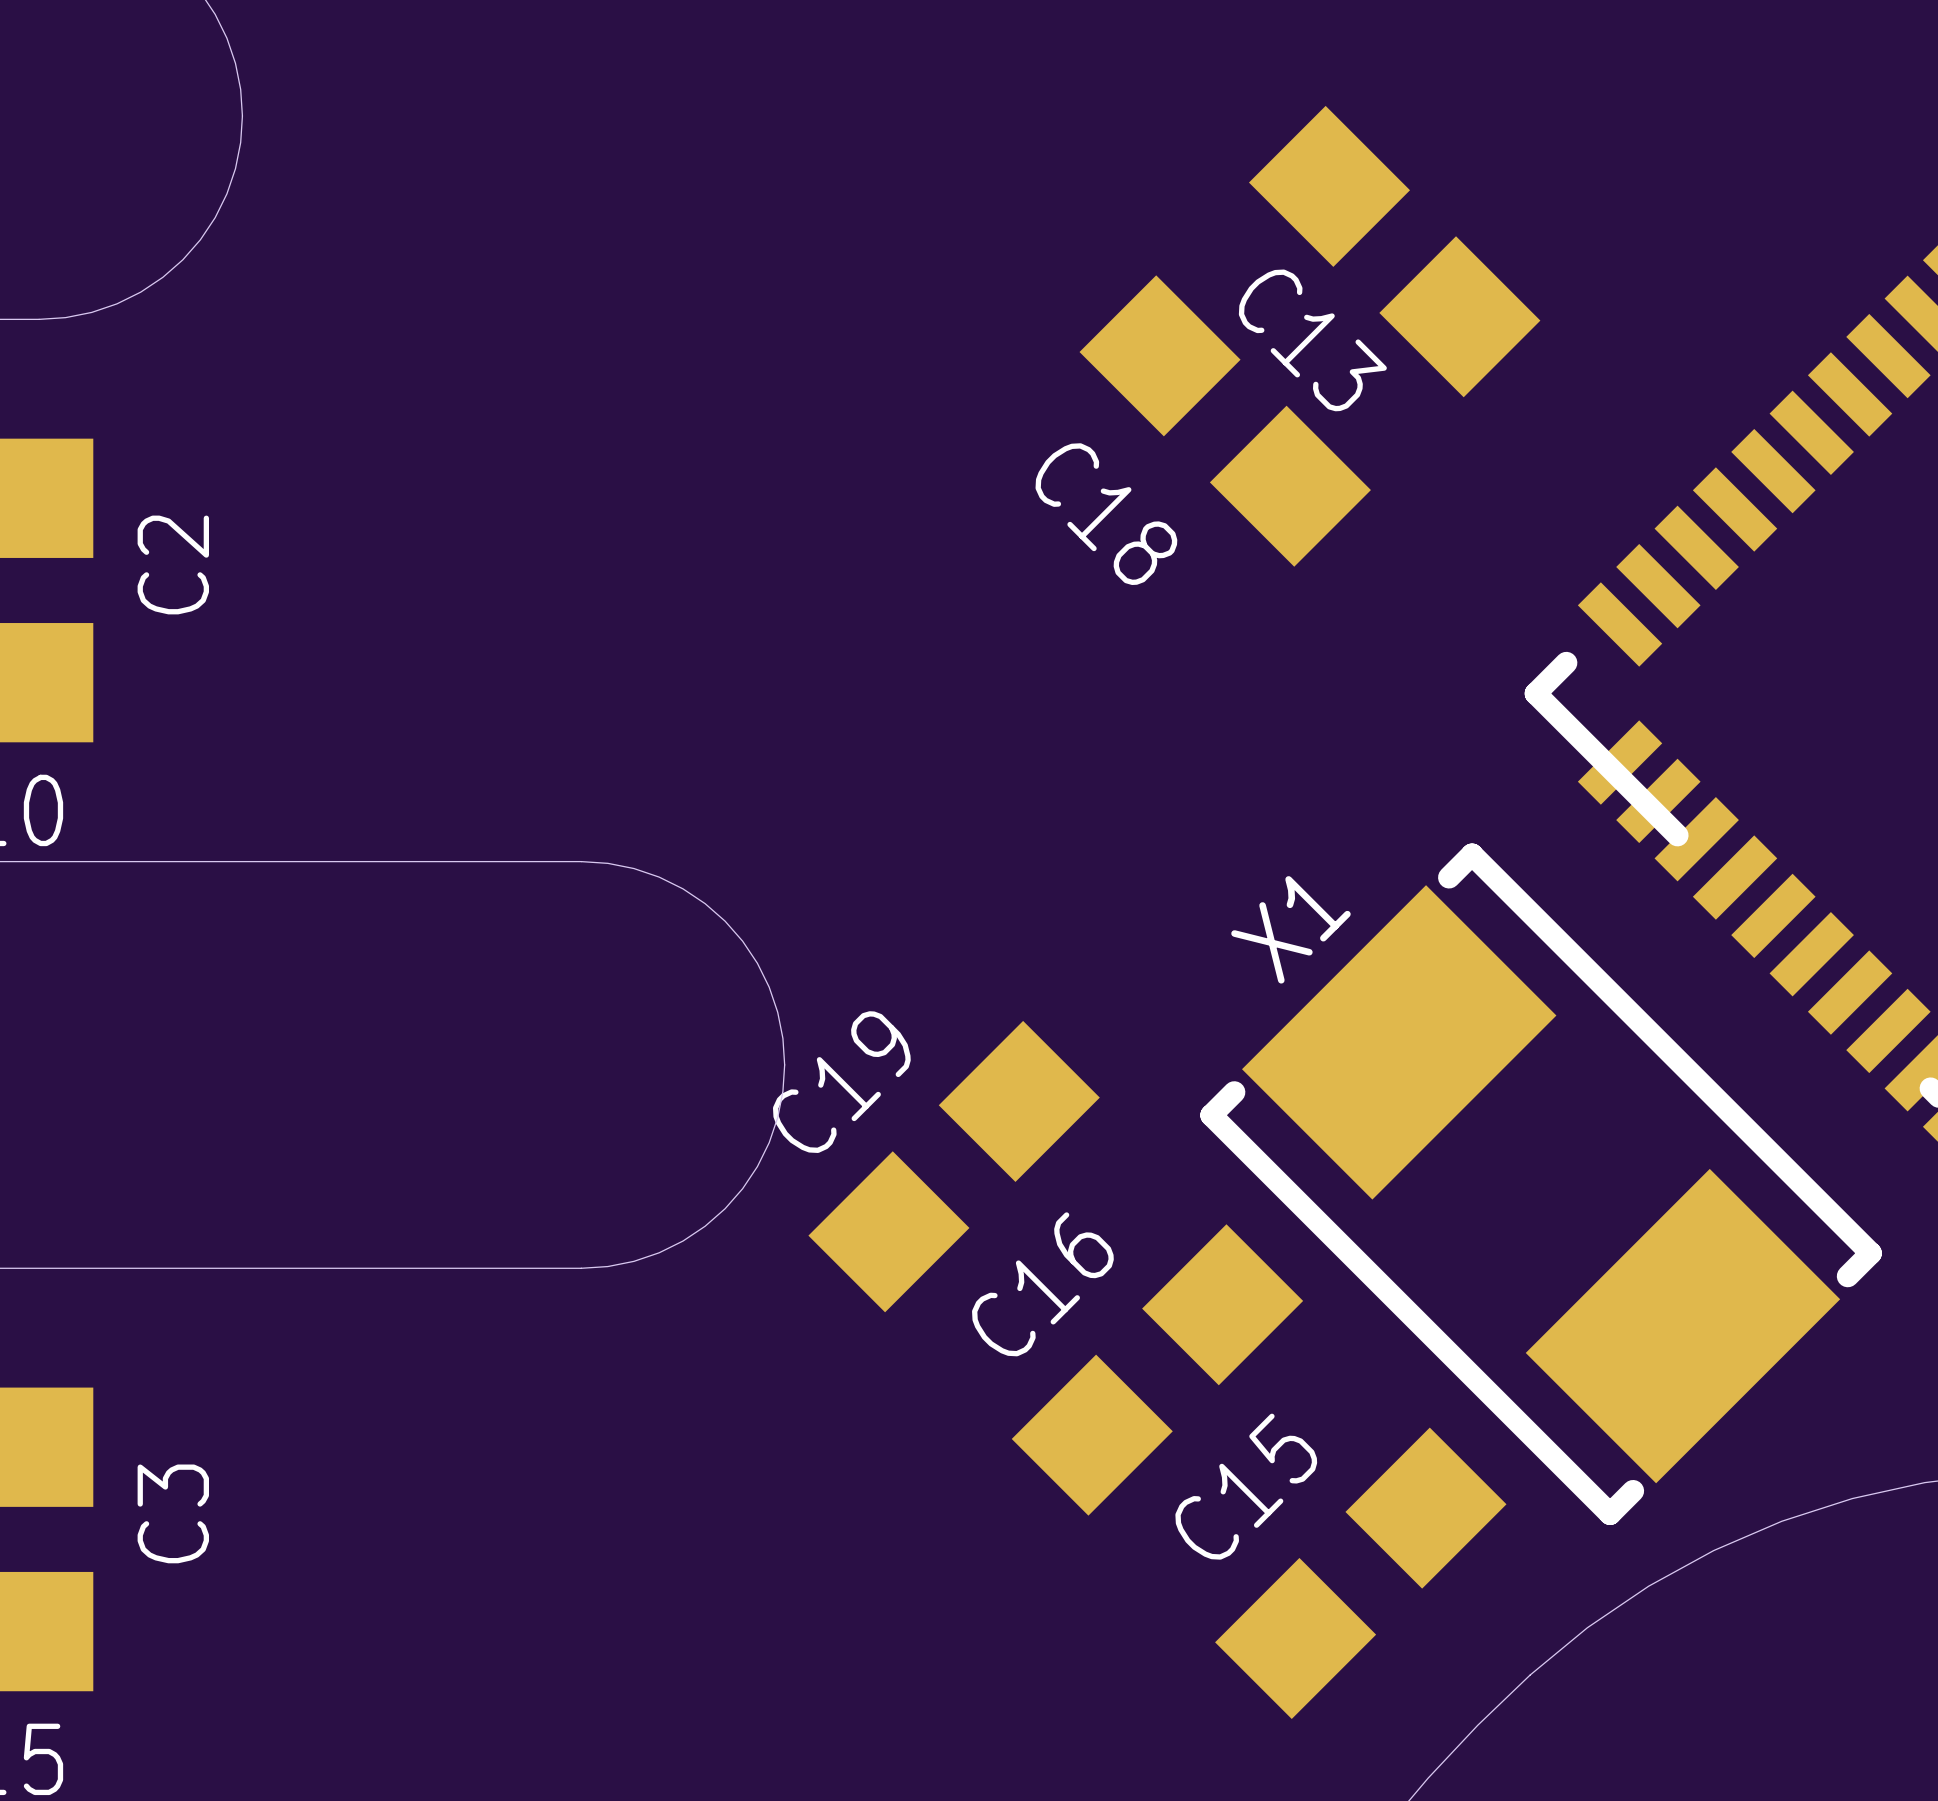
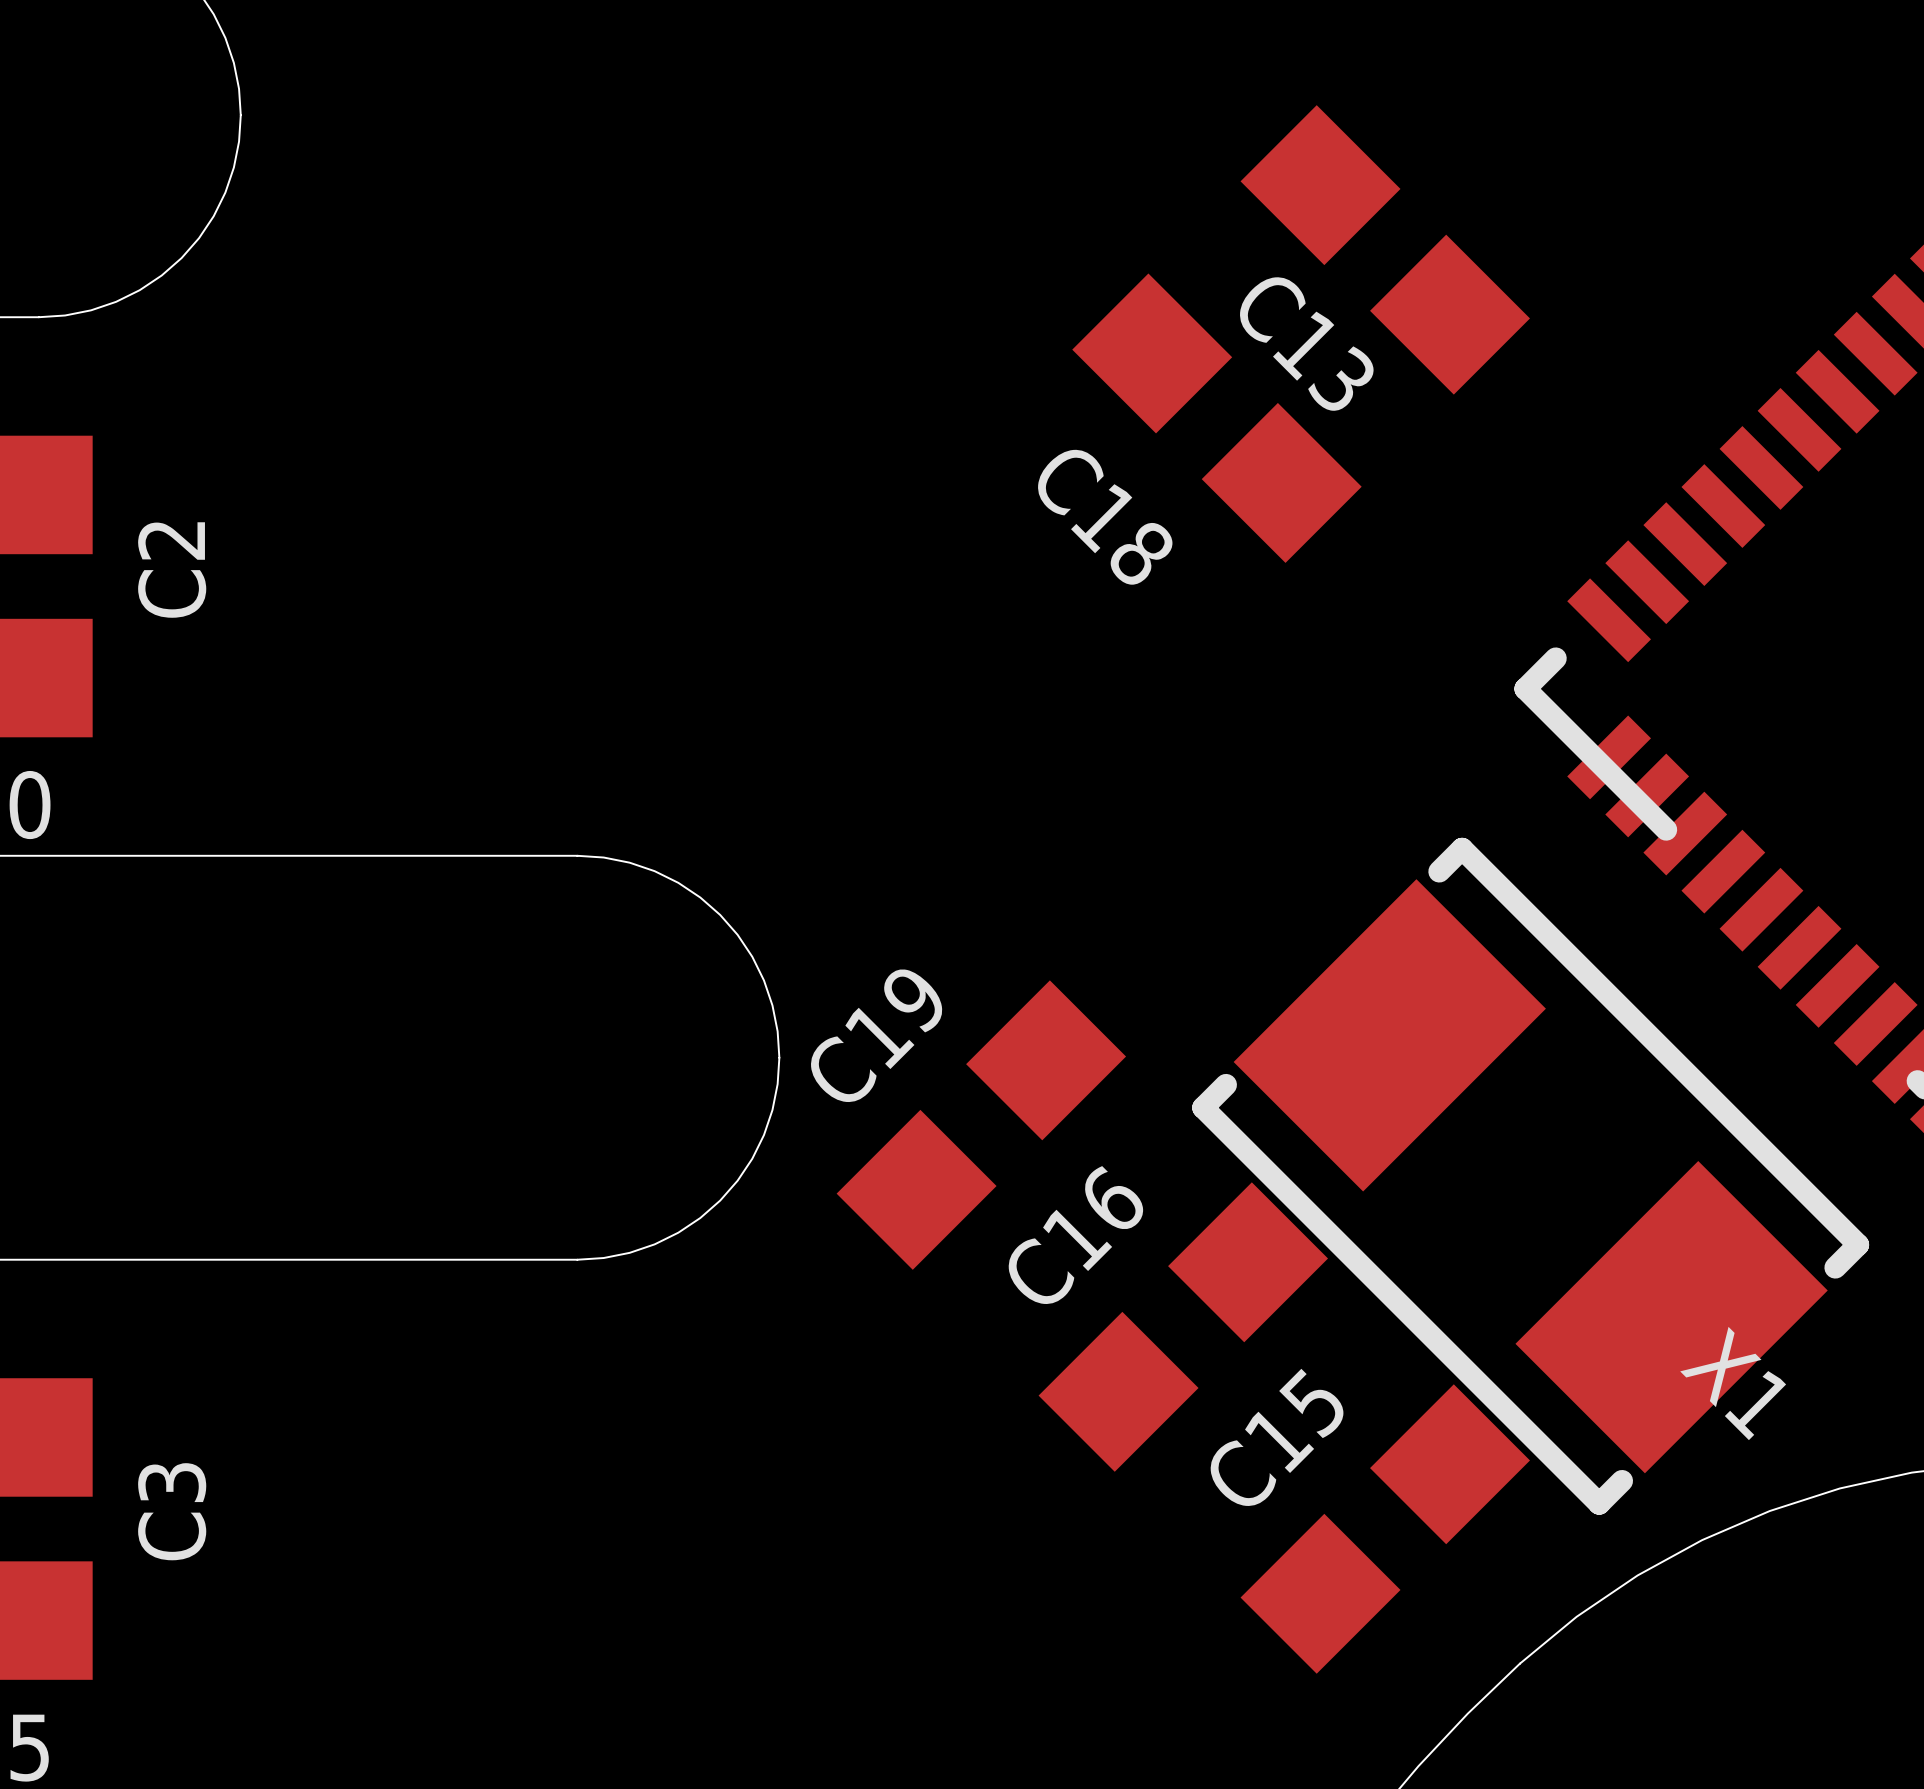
X1 name rotation: 0° (1290, 929) -> 90° clockwise (1733, 1383)
X1 name position: X1 (1290, 929) -> X1 (1733, 1383)
C19 position: (954, 1166) -> (981, 1125)
C16 position: (1157, 1369) -> (1183, 1327)
C15 position: (1360, 1573) -> (1385, 1529)

